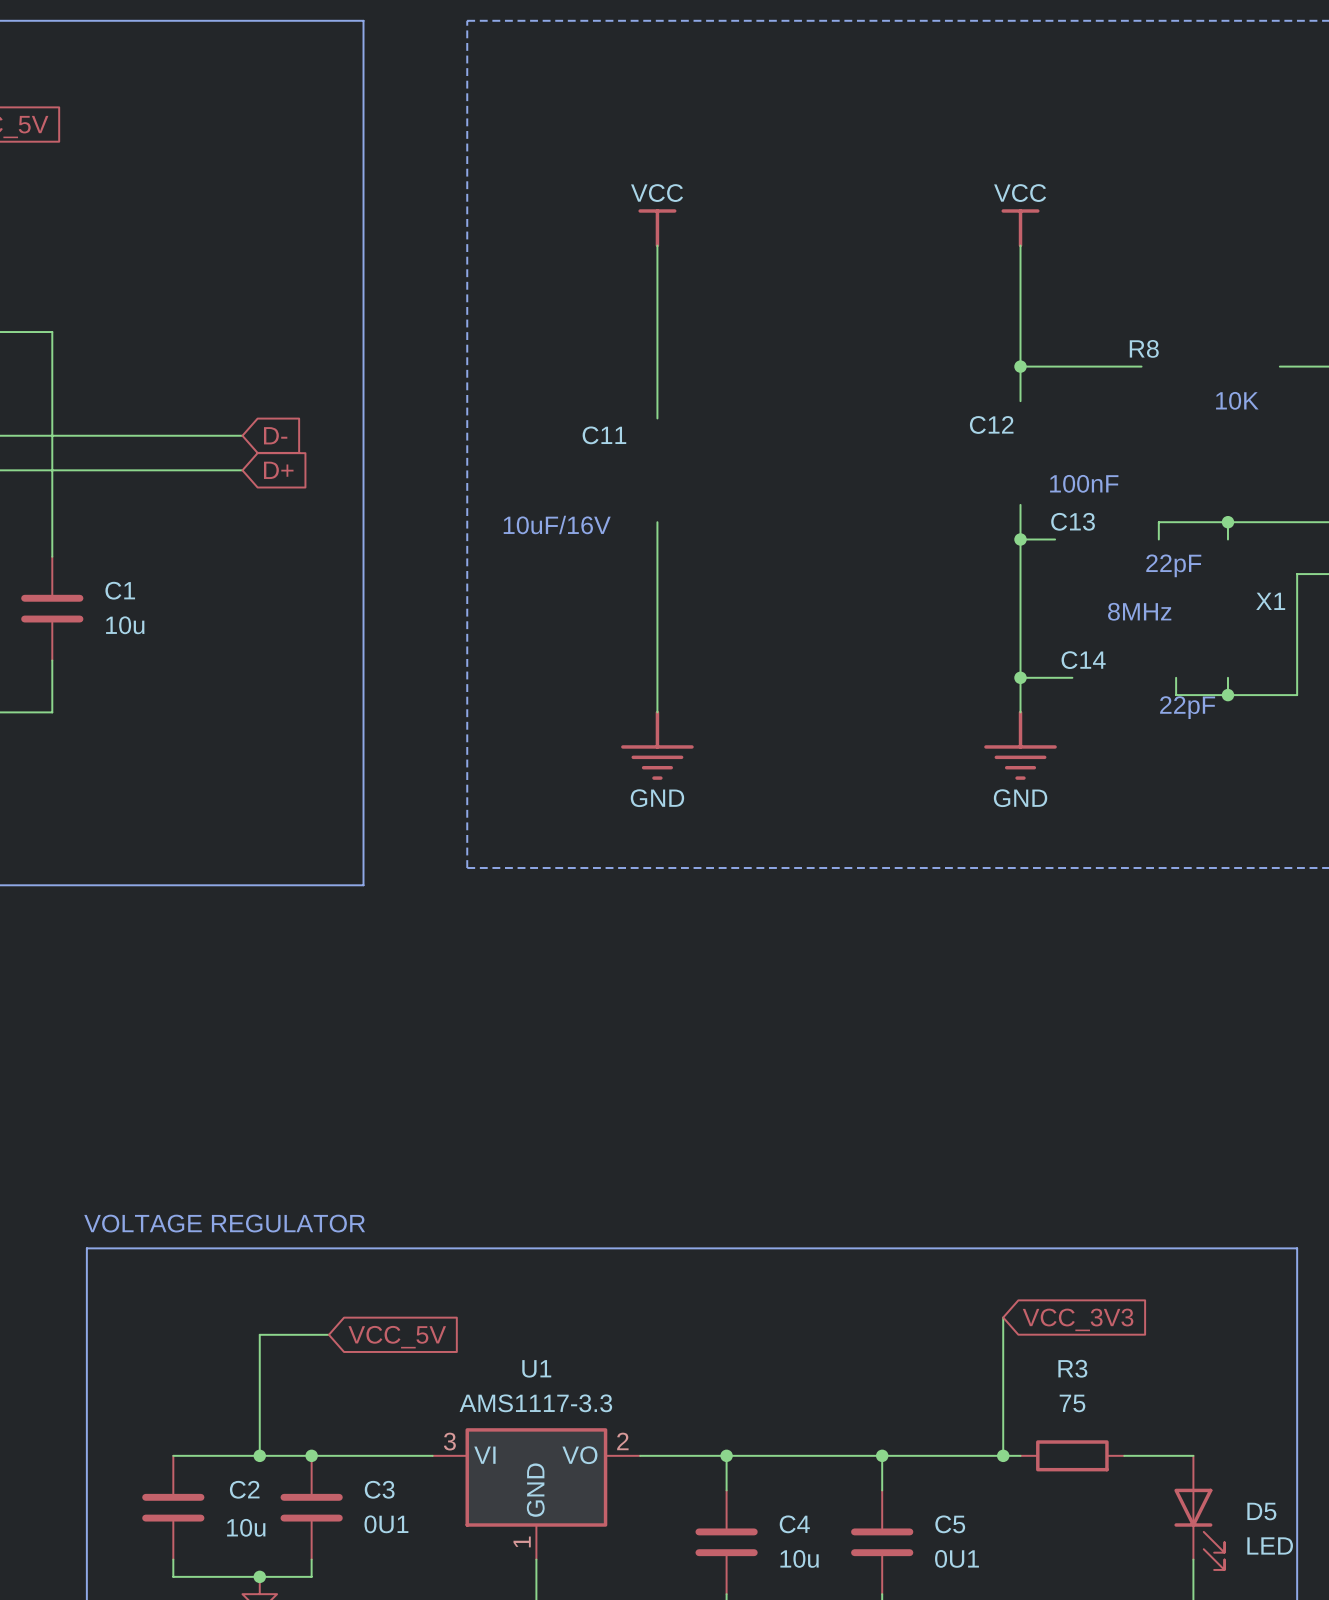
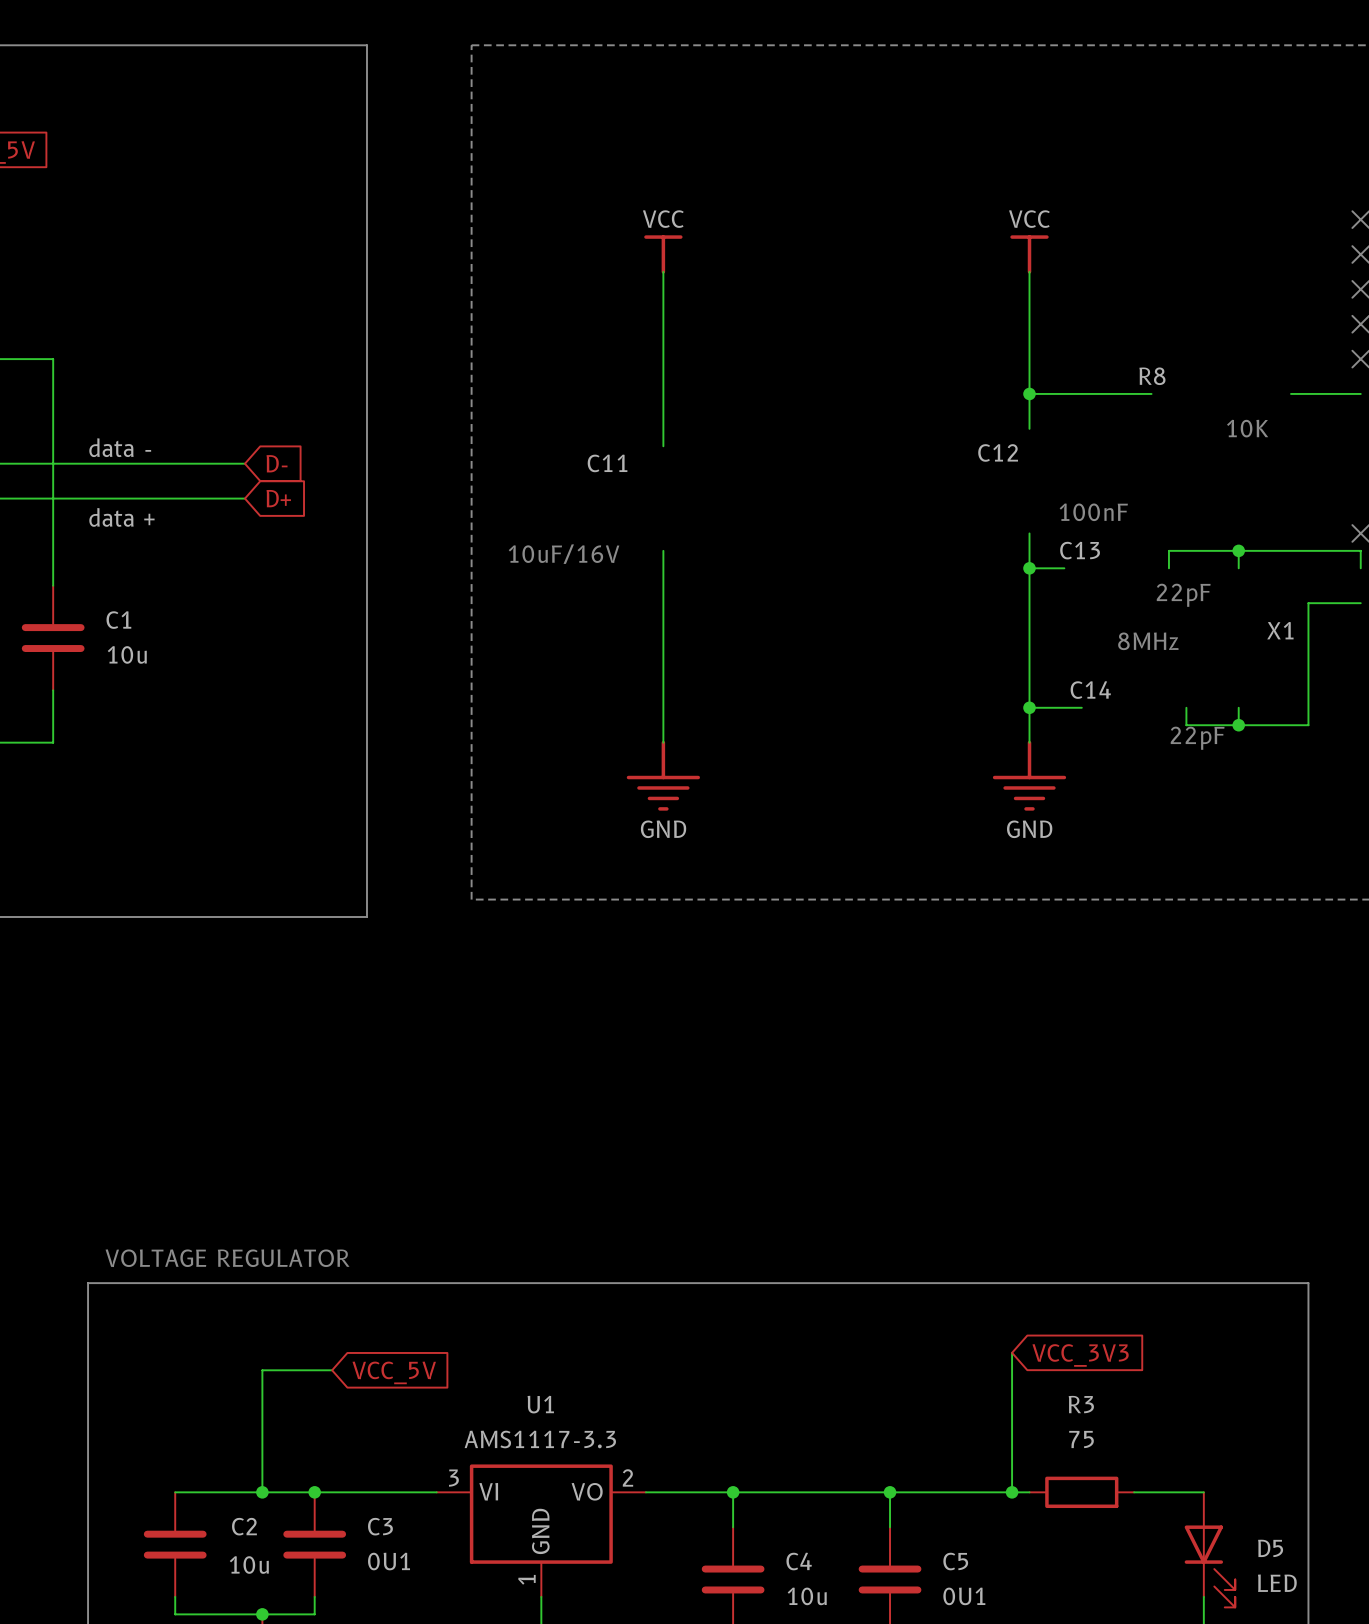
label: none -> data - (120, 447)
label: none -> data + (121, 517)

